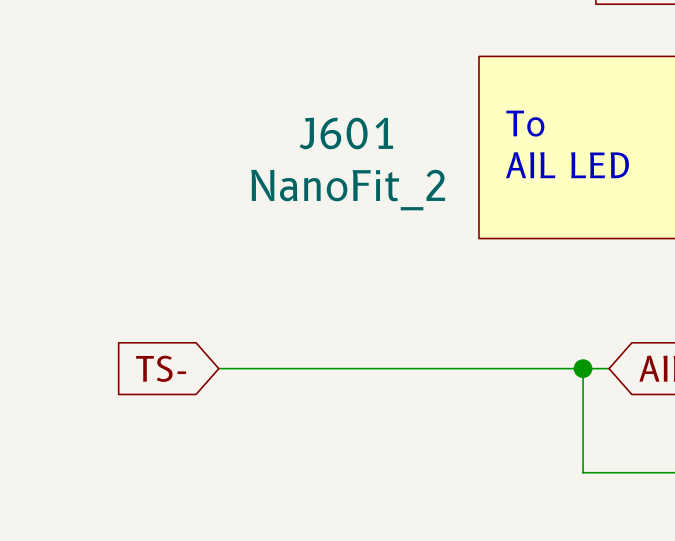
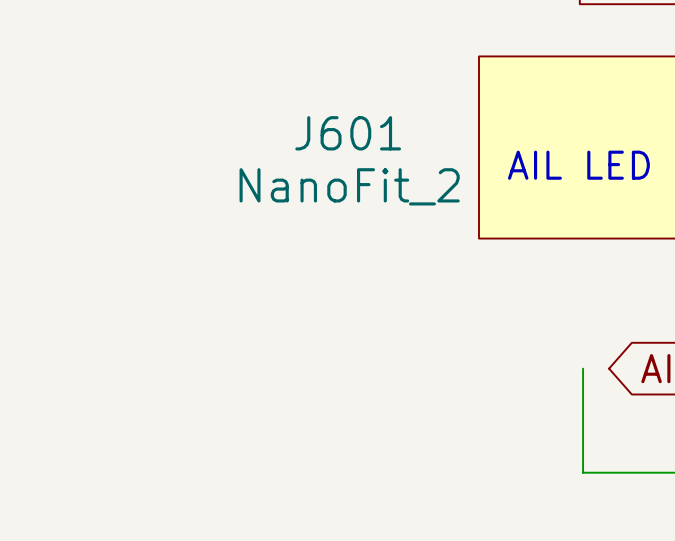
text: To (525, 123) -> none
global label: TS- (161, 368) -> none
wire: (218, 368) (609, 368) -> none
junction: (583, 368) -> none

